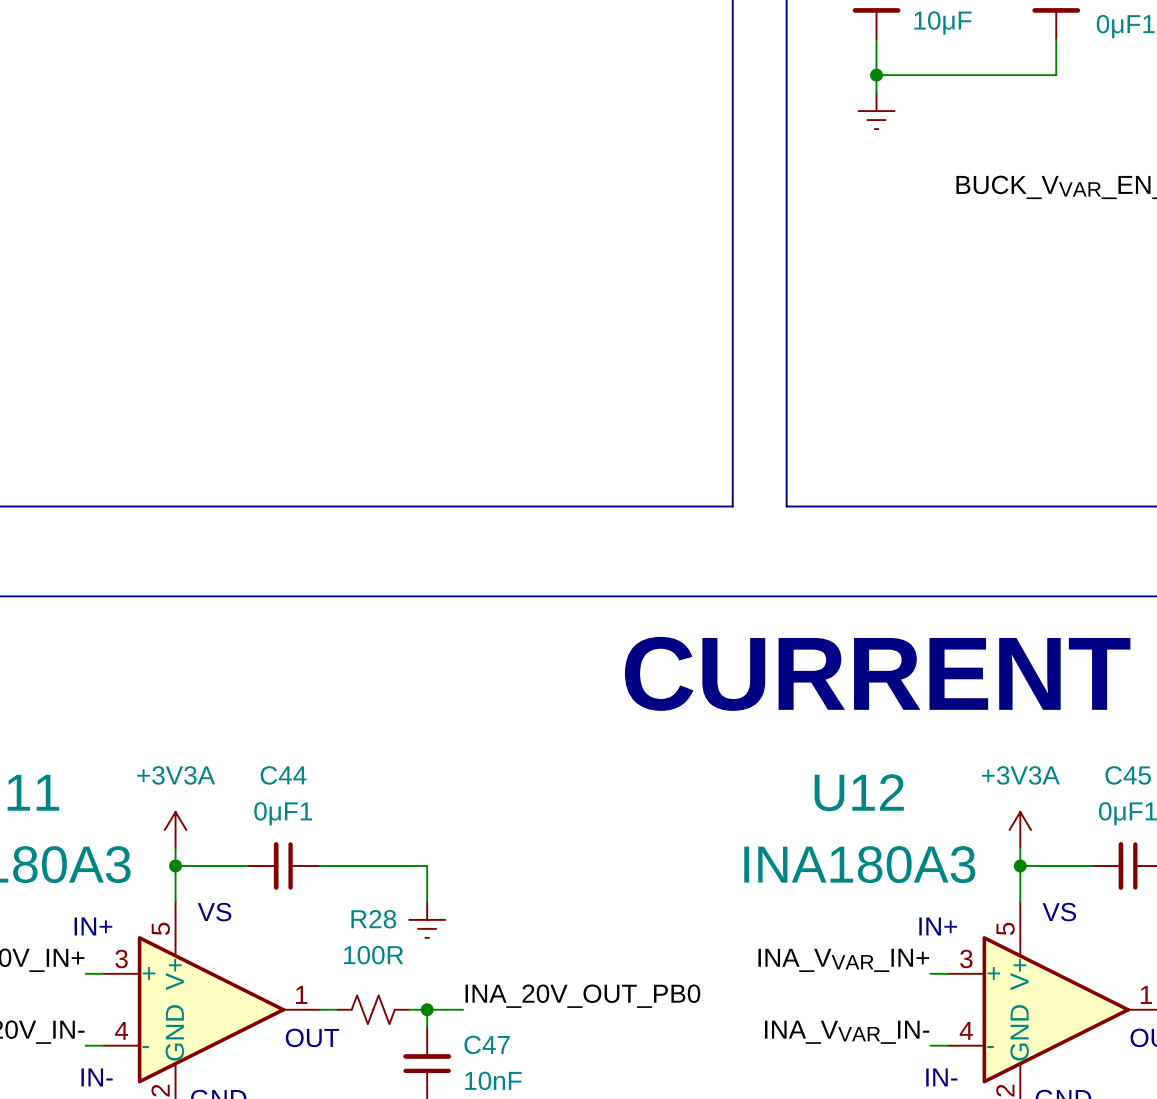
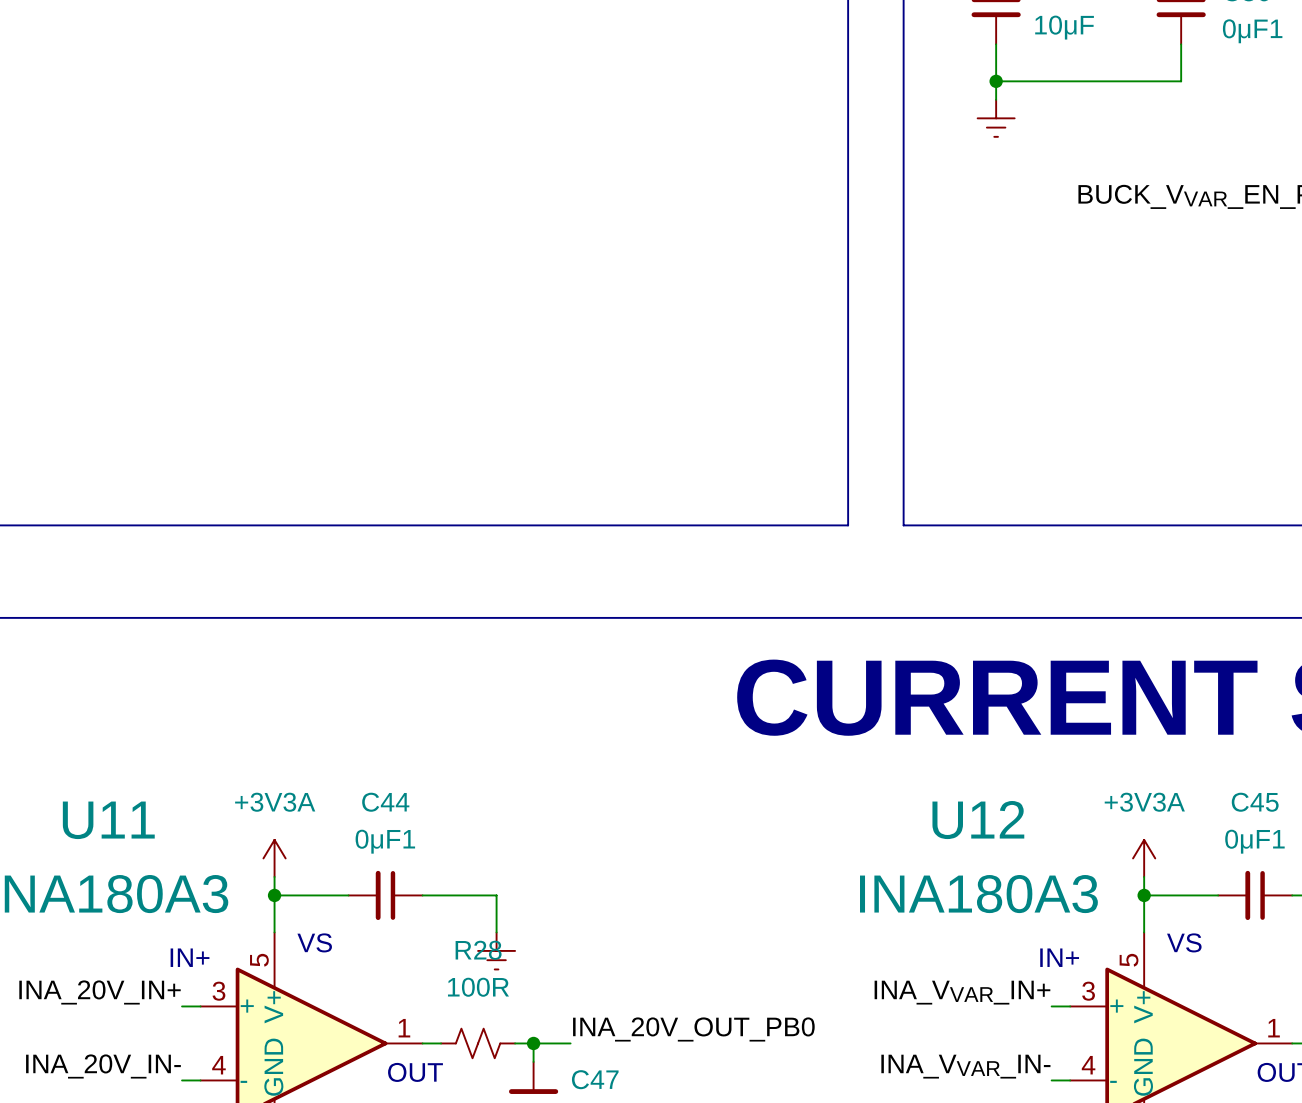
wire: (391, 865) (427, 865) (427, 901) -> (496, 895) (496, 932)
power symbol position: (427, 919) -> (496, 950)

